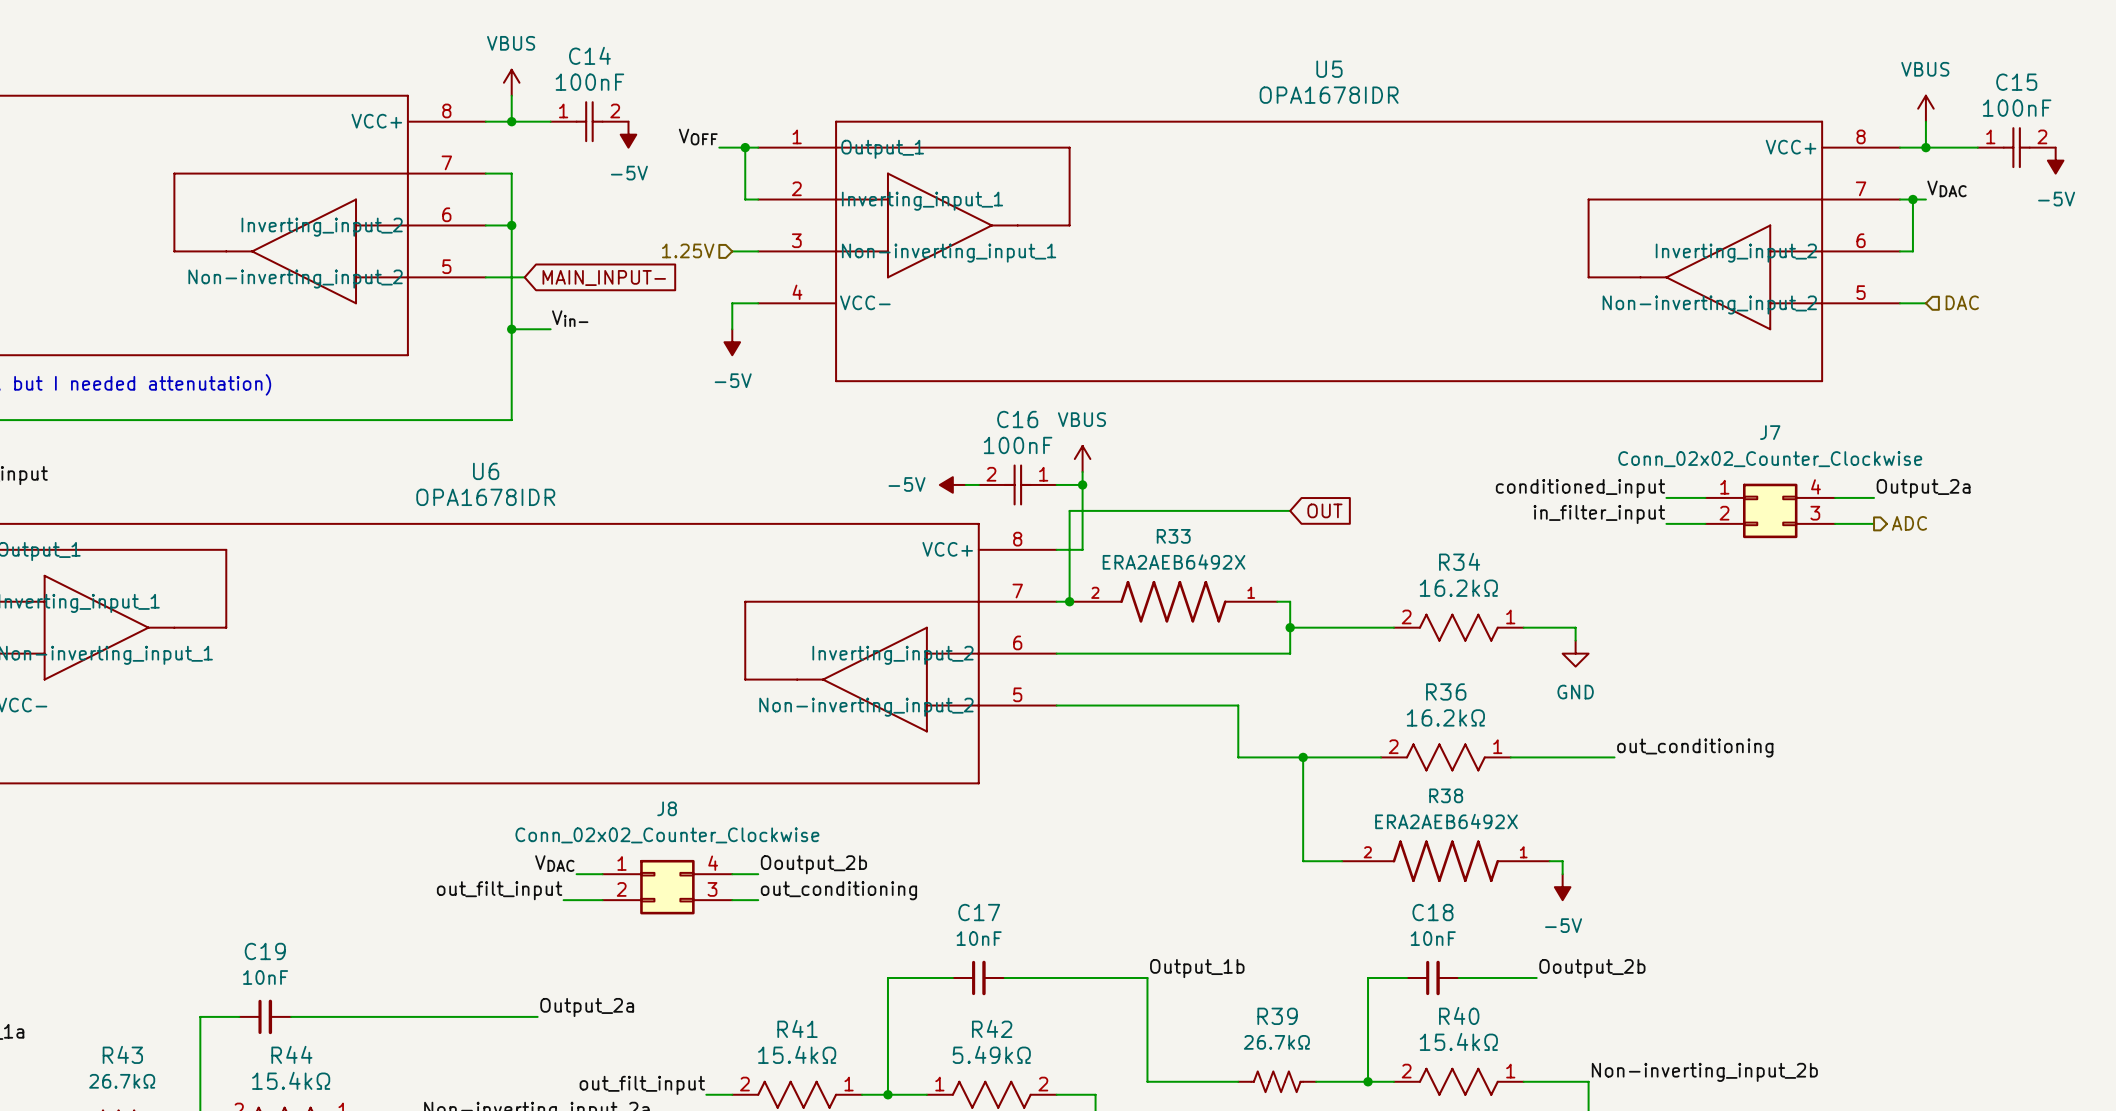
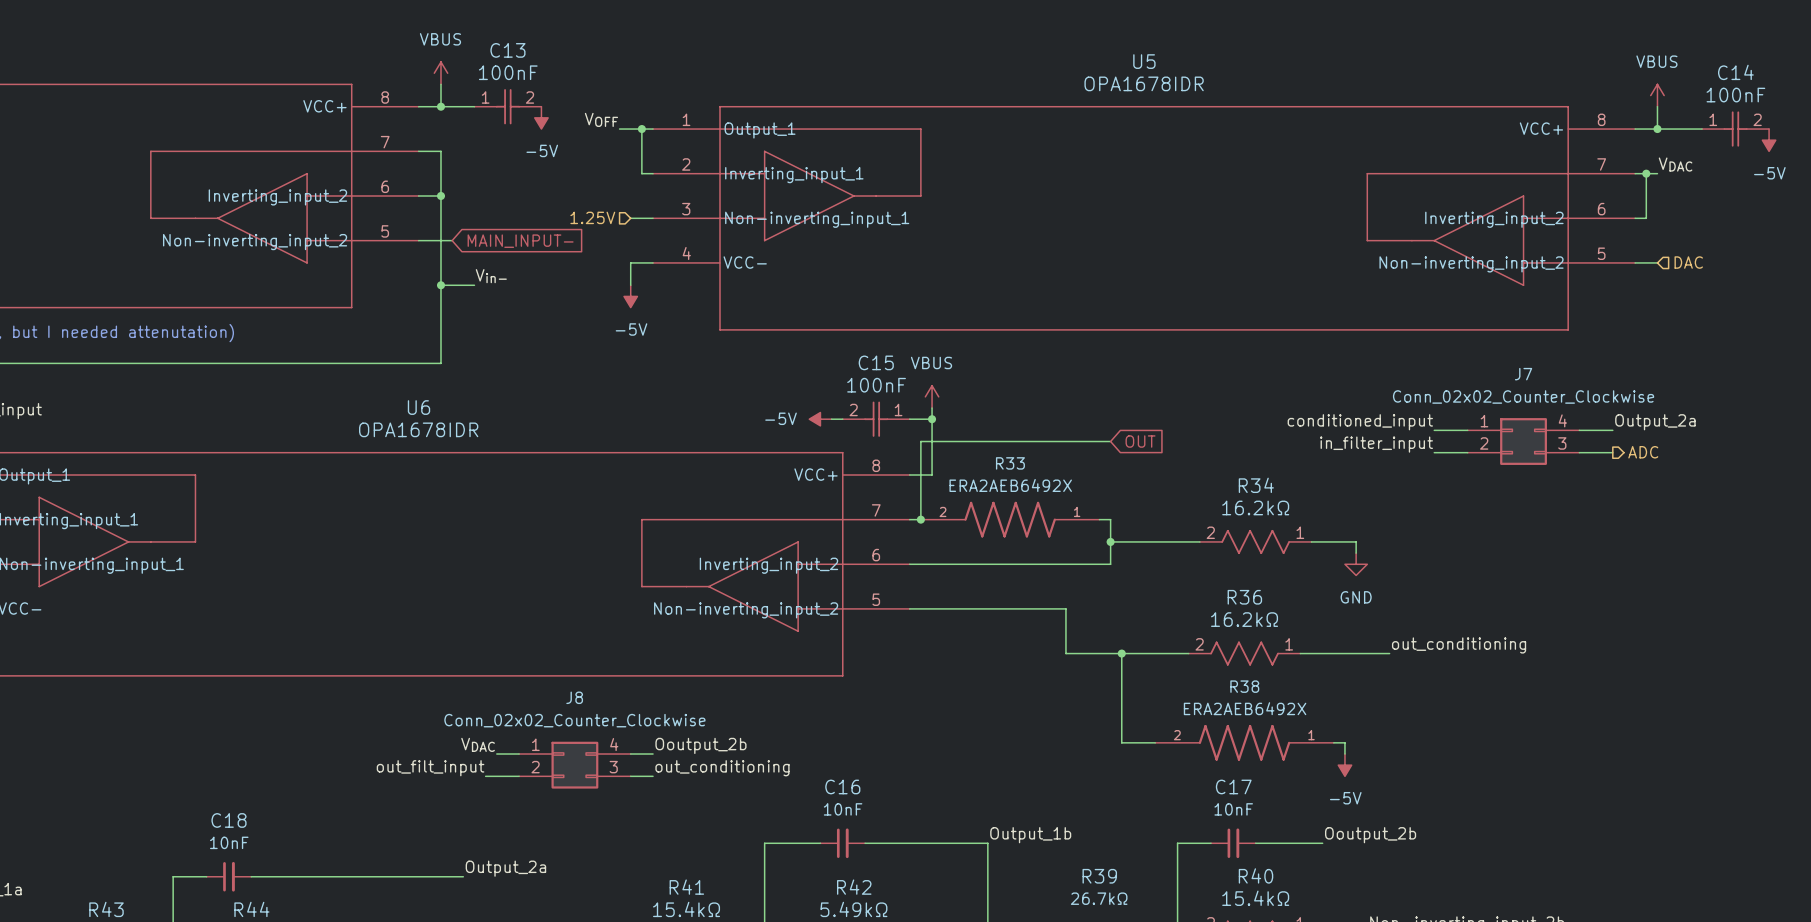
C14 name: C14 (589, 55) -> C13 (507, 50)
C15 name: C15 (2016, 82) -> C14 (1735, 72)
C16 name: C16 (1017, 419) -> C15 (876, 362)
C17 name: C17 (979, 912) -> C16 (842, 786)
C18 name: C18 (1432, 912) -> C17 (1233, 786)
C19 name: C19 (265, 951) -> C18 (229, 820)

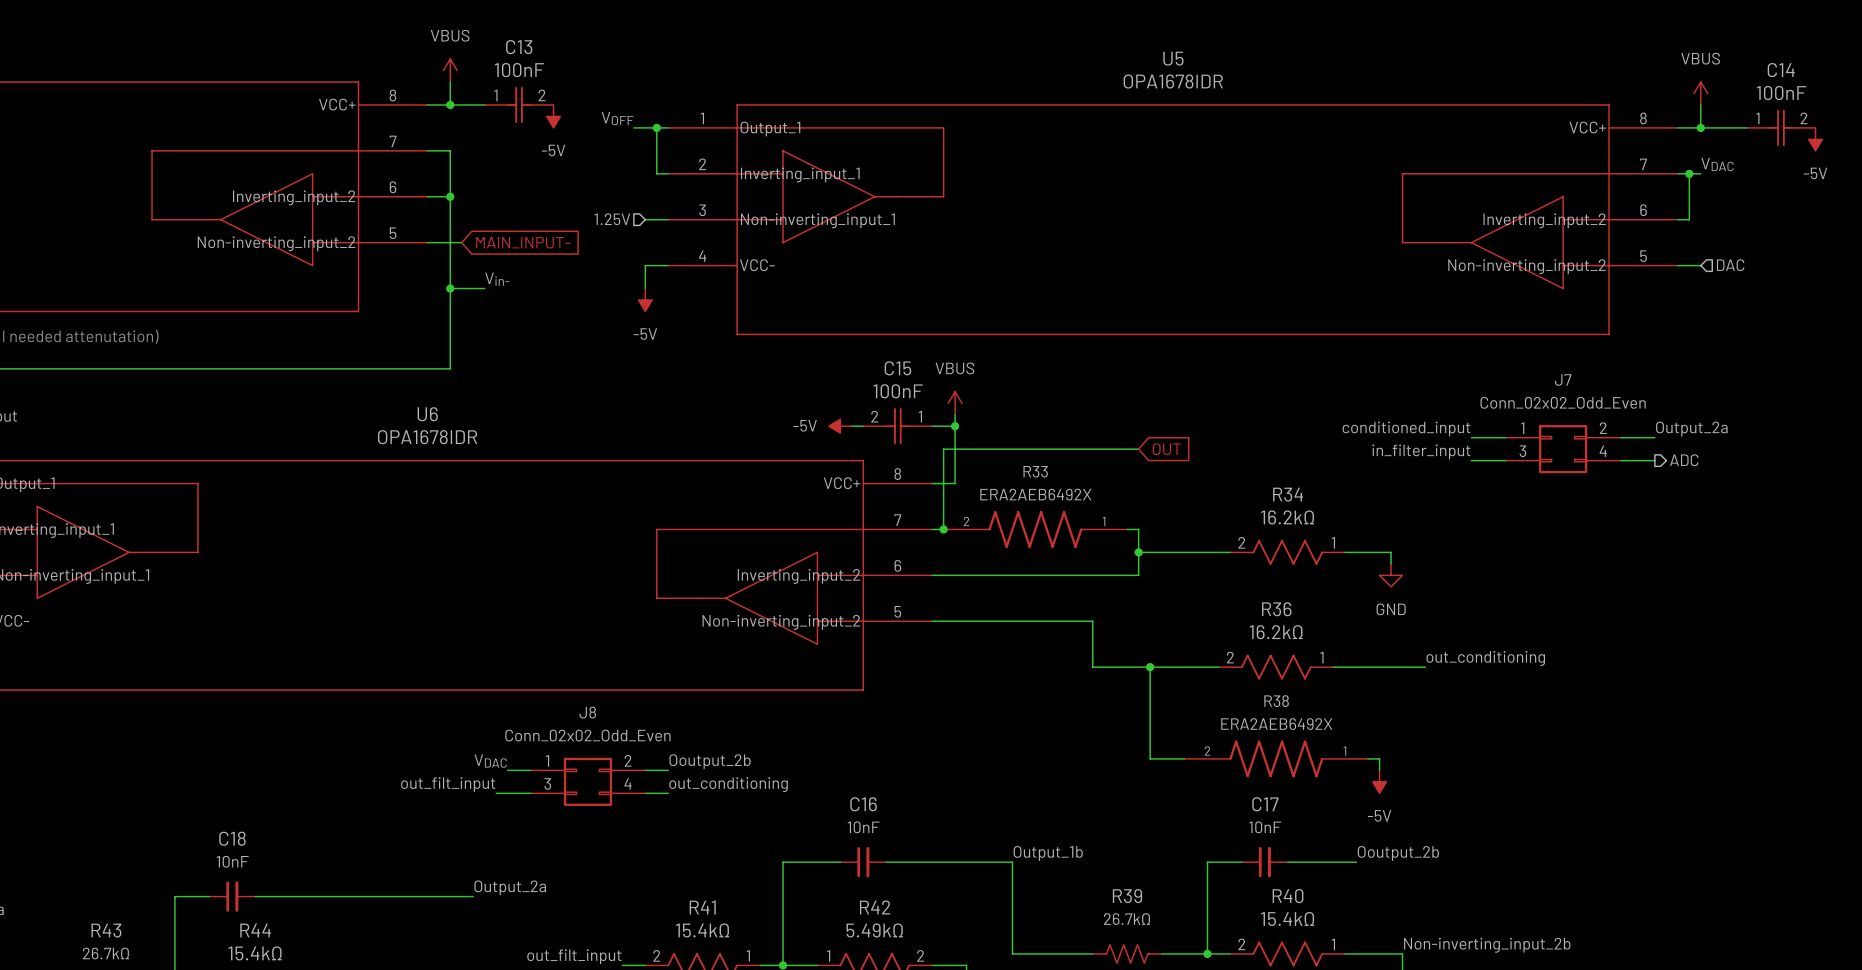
J7 value: Conn_02x02_Counter_Clockwise (1523, 396) -> Conn_02x02_Odd_Even (1563, 402)
J7 pin number: 4 (1562, 420) -> 2 (1603, 428)
J7 pin number: 2 (1484, 443) -> 3 (1522, 451)
J7 pin number: 3 (1562, 443) -> 4 (1603, 451)
J8 value: Conn_02x02_Counter_Clockwise (574, 720) -> Conn_02x02_Odd_Even (587, 735)
J8 pin number: 4 (614, 744) -> 2 (628, 760)
J8 pin number: 2 (535, 767) -> 3 (547, 783)
J8 pin number: 3 (613, 767) -> 4 (628, 783)

